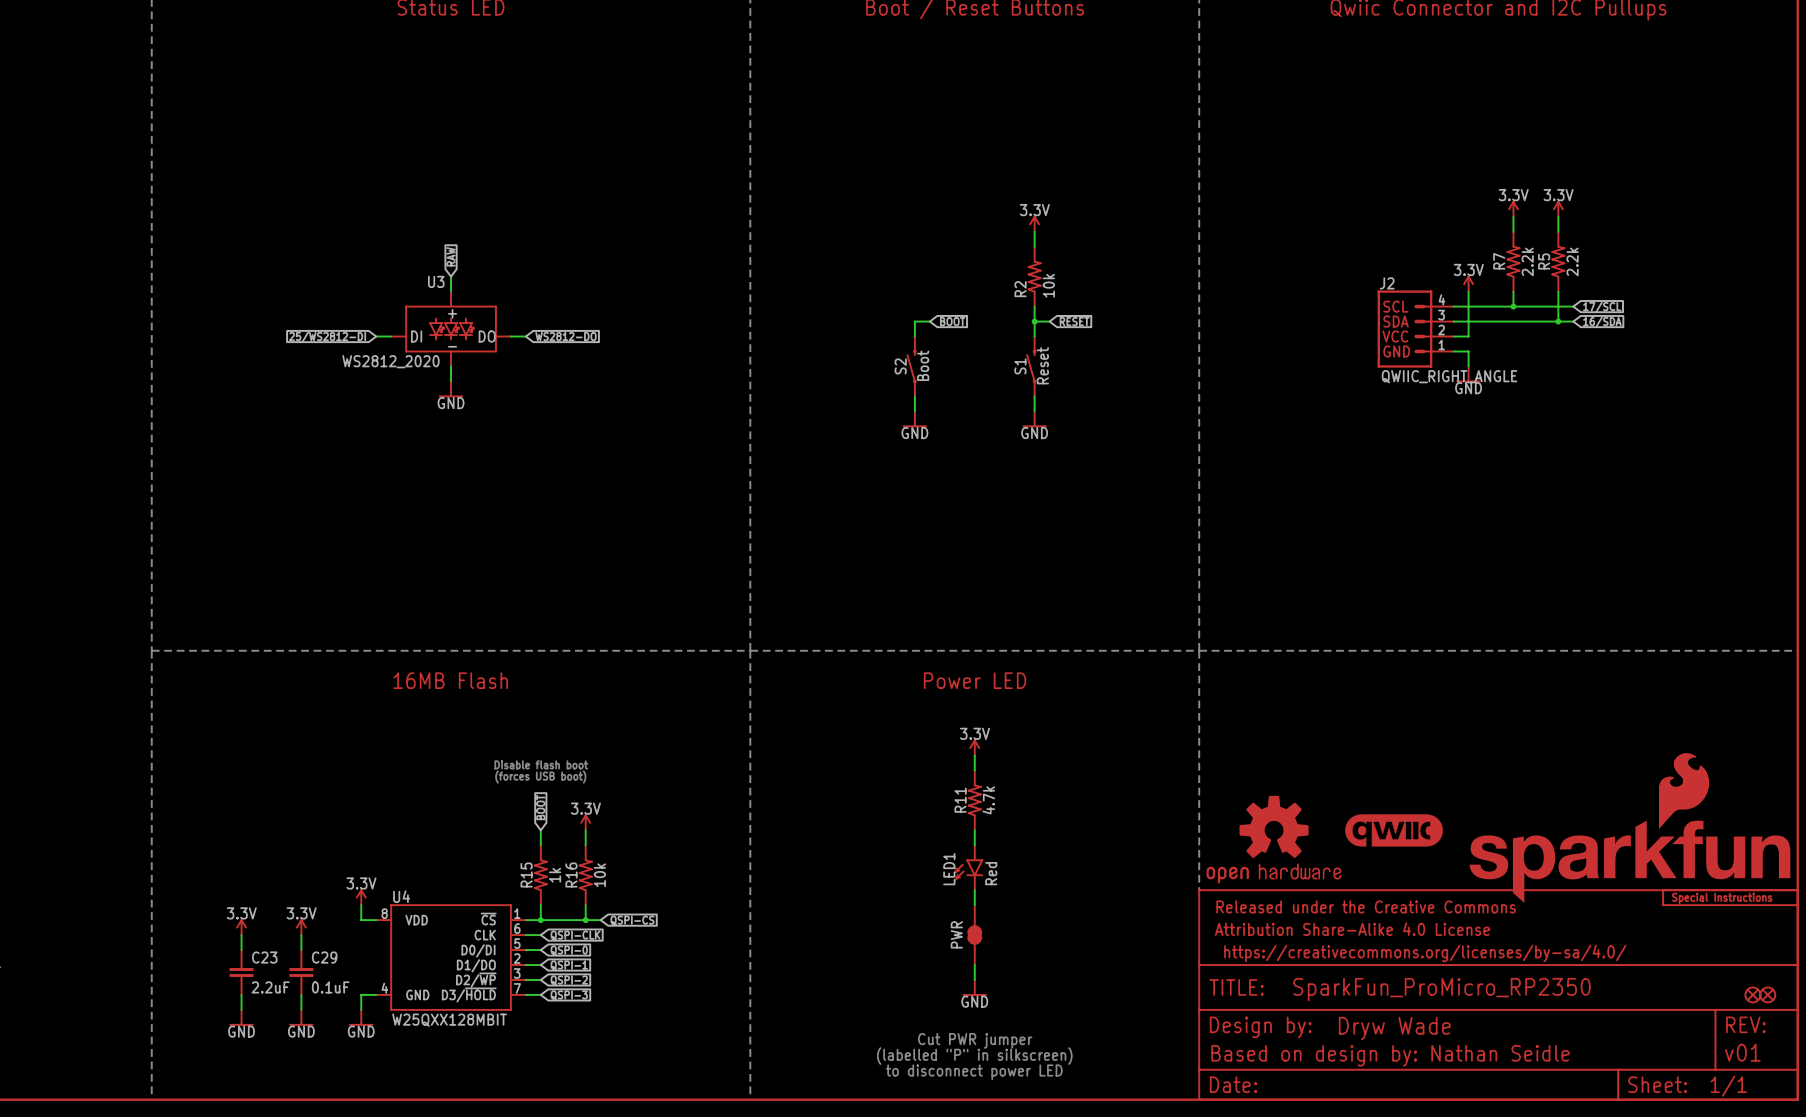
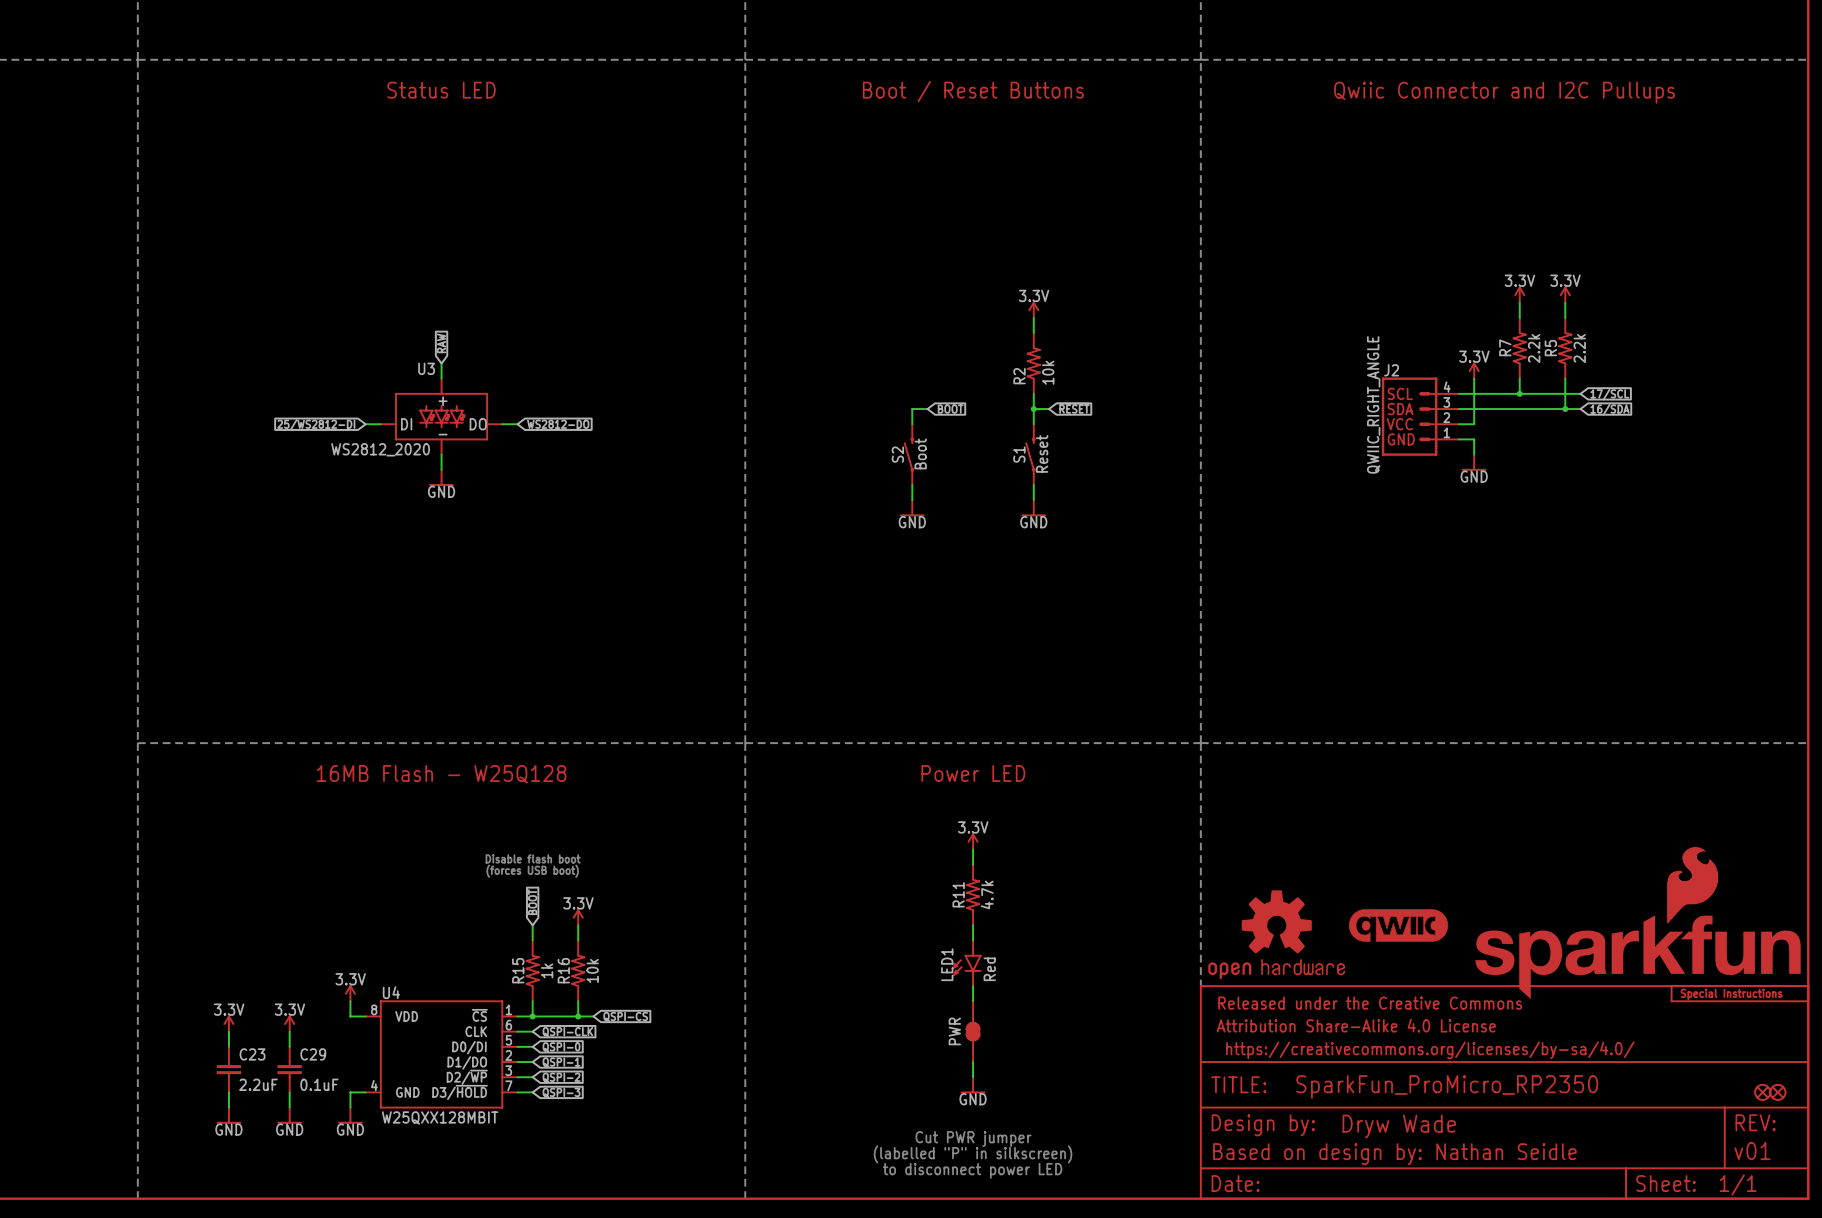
J2 value rotation: 0° (1449, 376) -> 90° counterclockwise (1373, 404)
text: 16MB Flash (450, 680) -> 16MB Flash - W25Q128 (441, 774)

